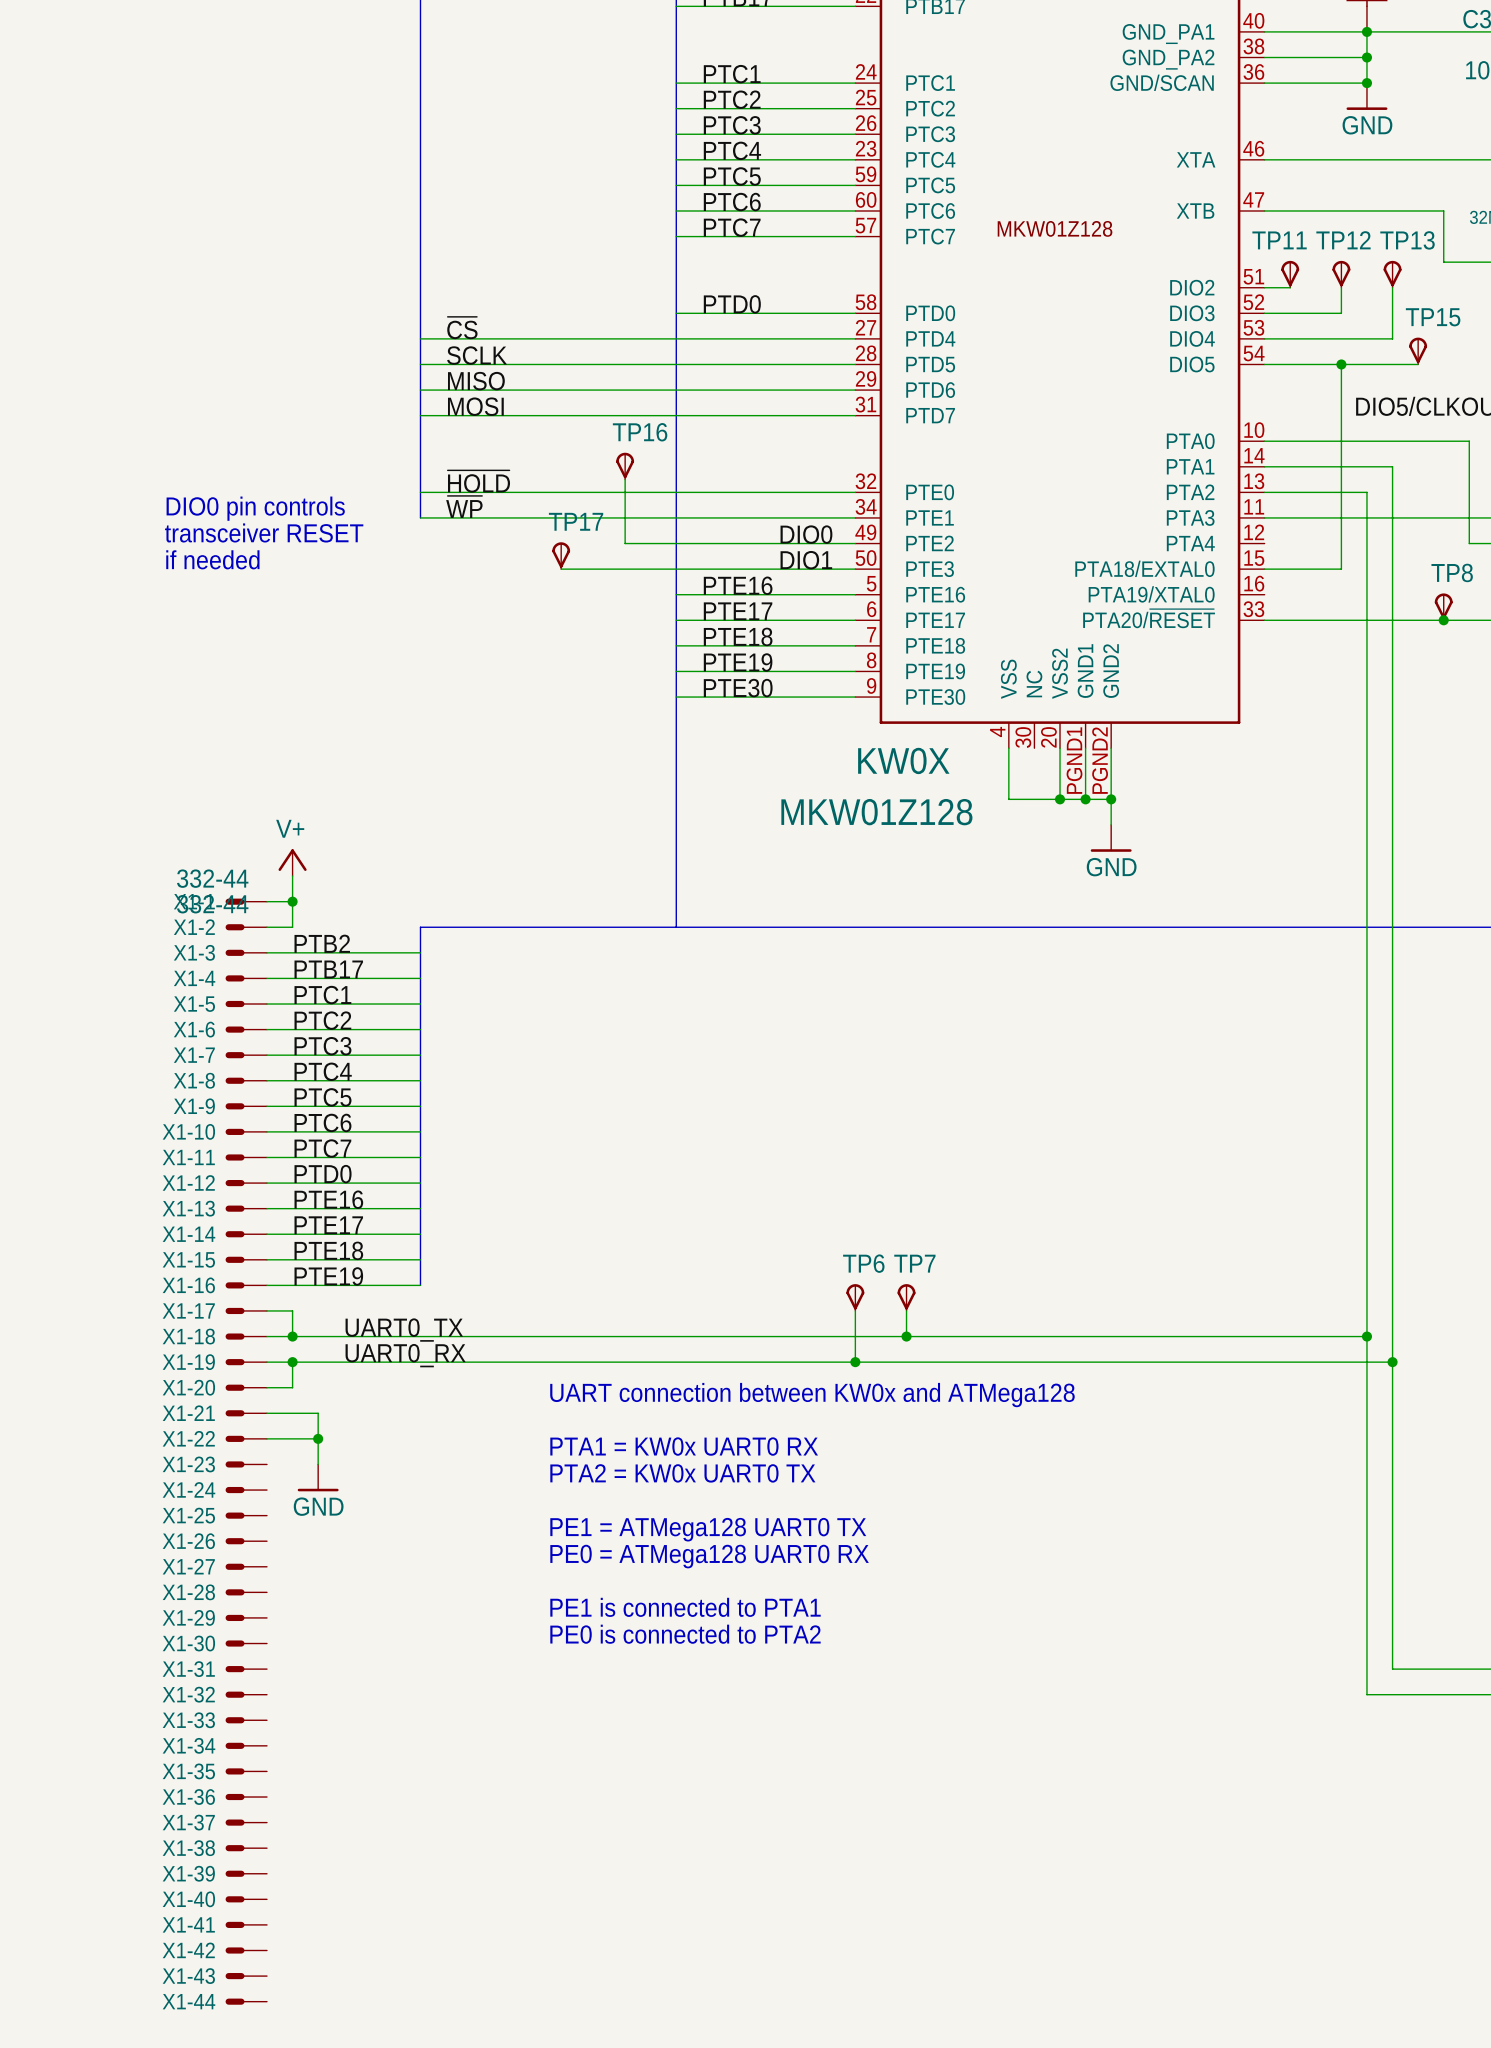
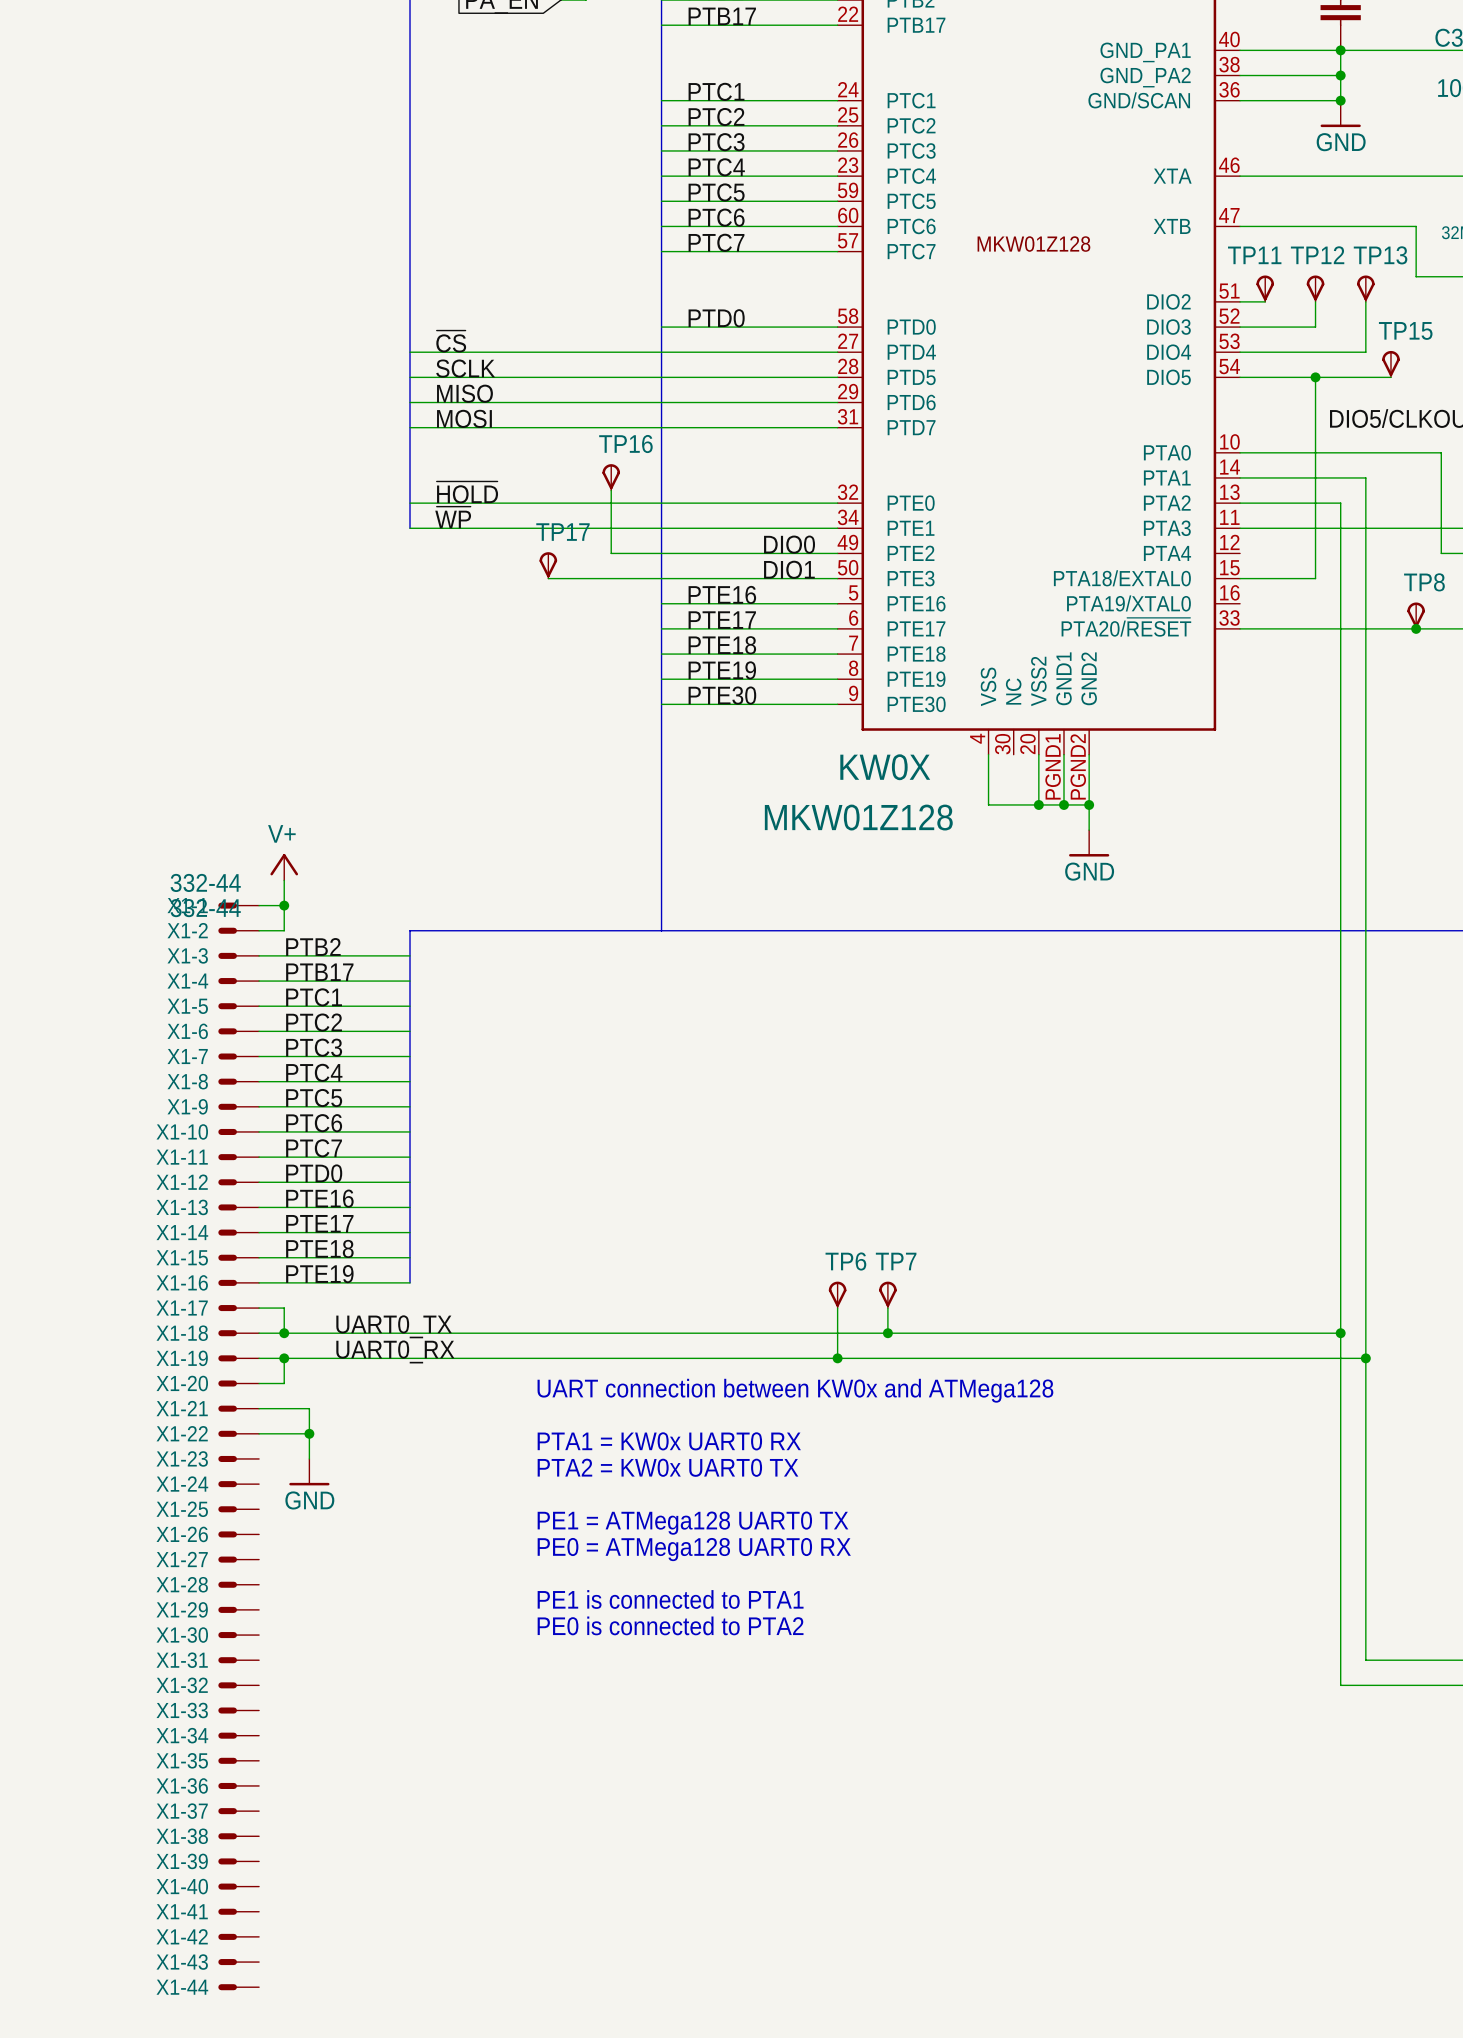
text: DIO0 pin controls (255, 508) -> none
text: transceiver RESET (264, 532) -> none
text: if needed (212, 559) -> none

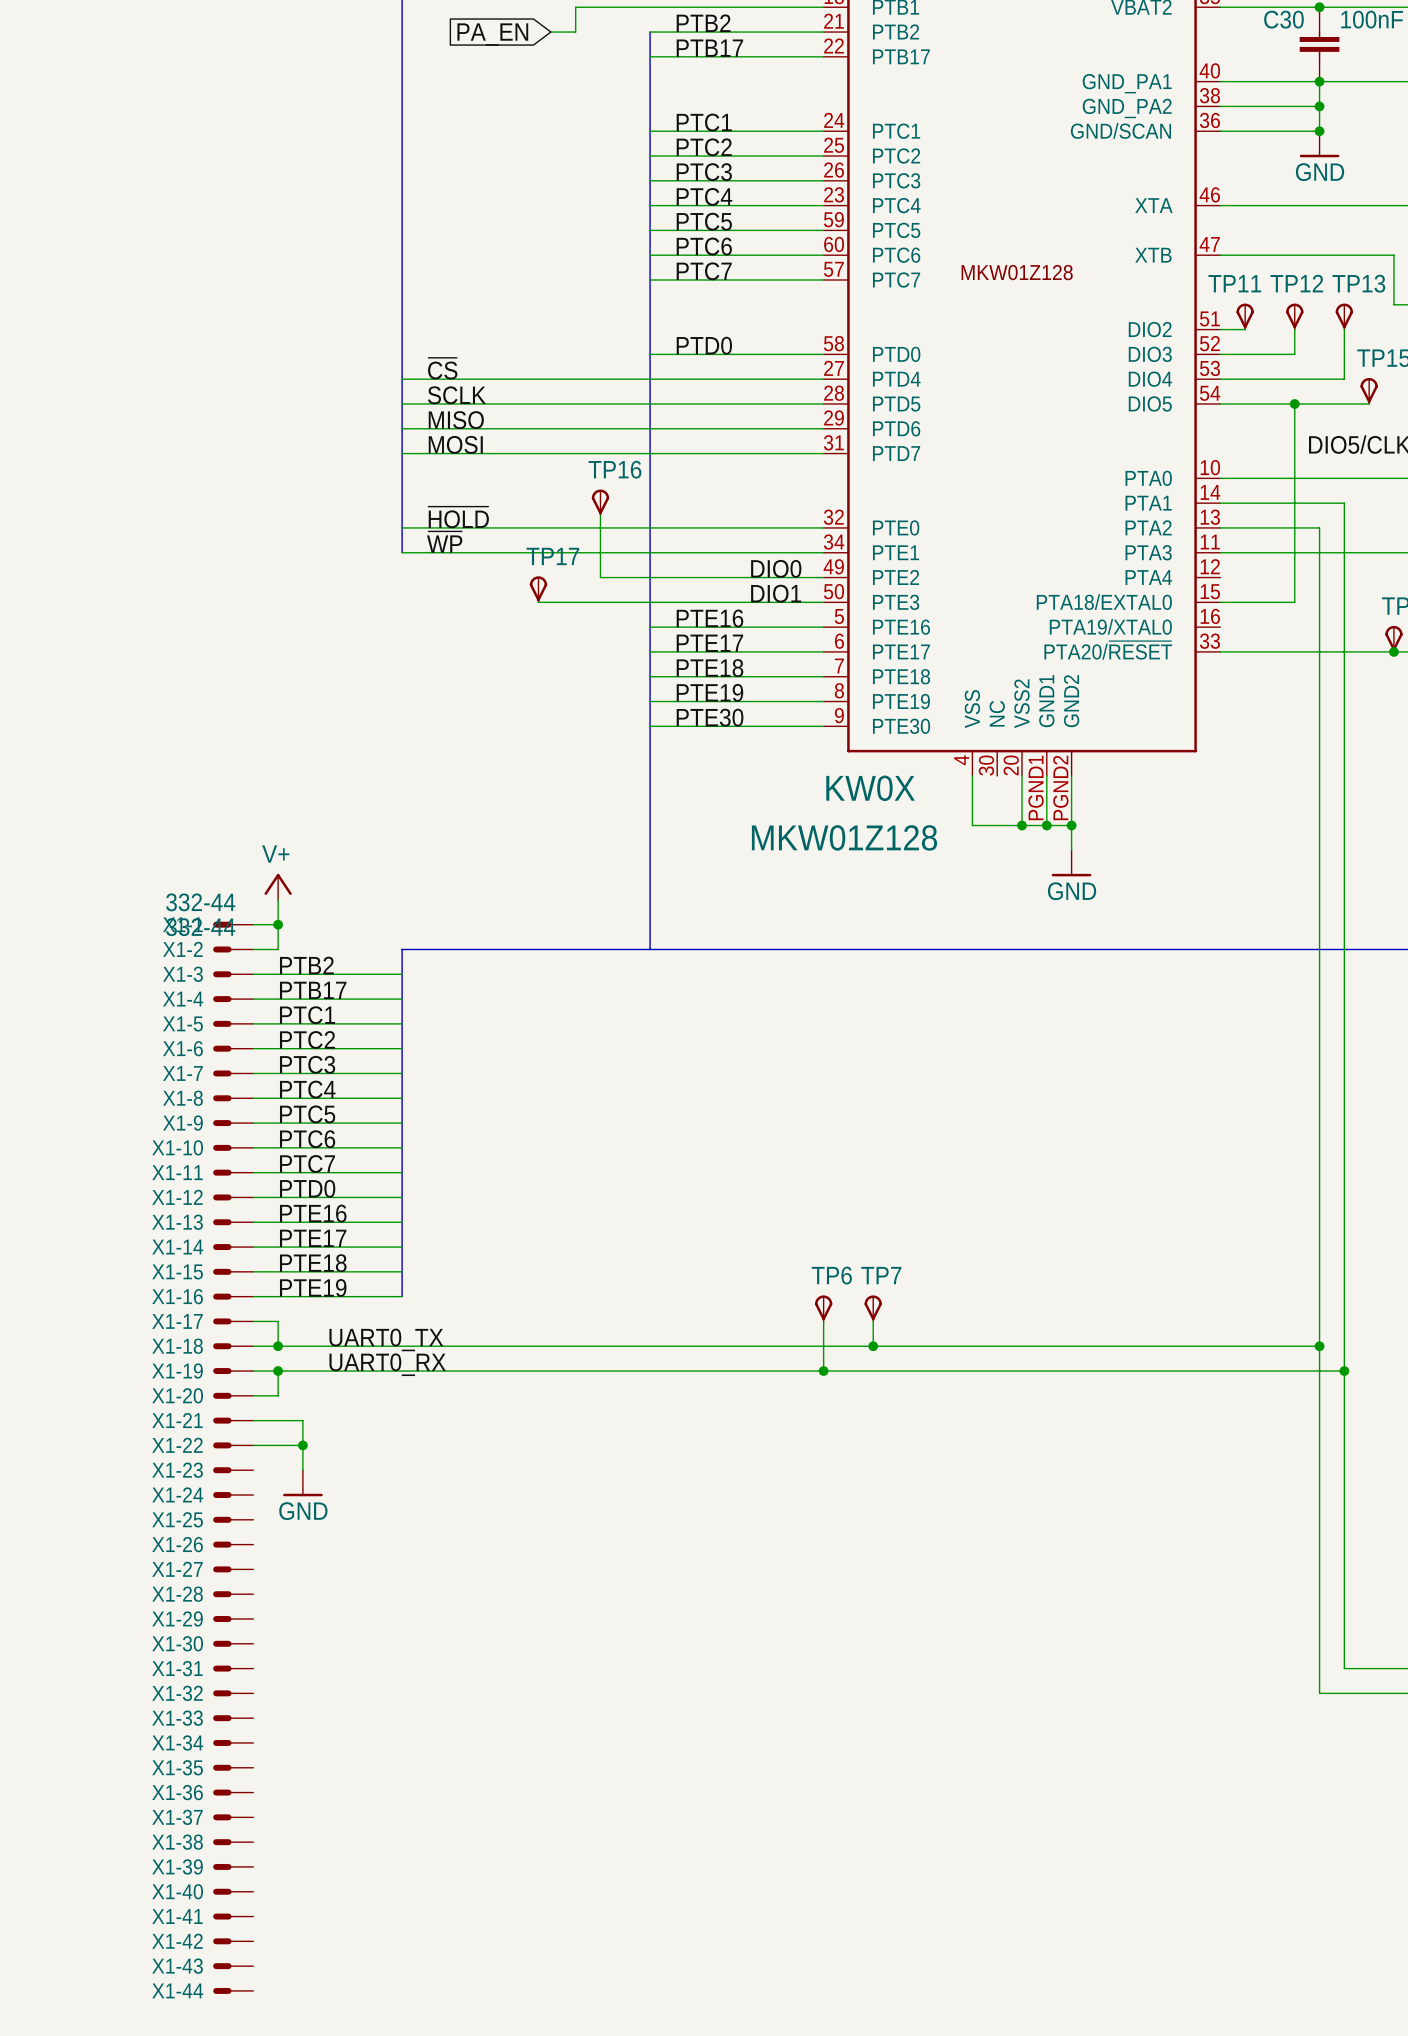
text: UART connection between KW0x and ATMega128 (795, 1390) -> none
text: PTA1 = KW0x UART0 RX (669, 1441) -> none
text: PTA2 = KW0x UART0 TX (667, 1467) -> none
text: PE1 = ATMega128 UART0 TX (692, 1523) -> none
text: PE0 = ATMega128 UART0 RX (694, 1549) -> none
text: PE1 is connected to PTA1 (670, 1599) -> none
text: PE0 is connected to PTA2 (670, 1625) -> none

